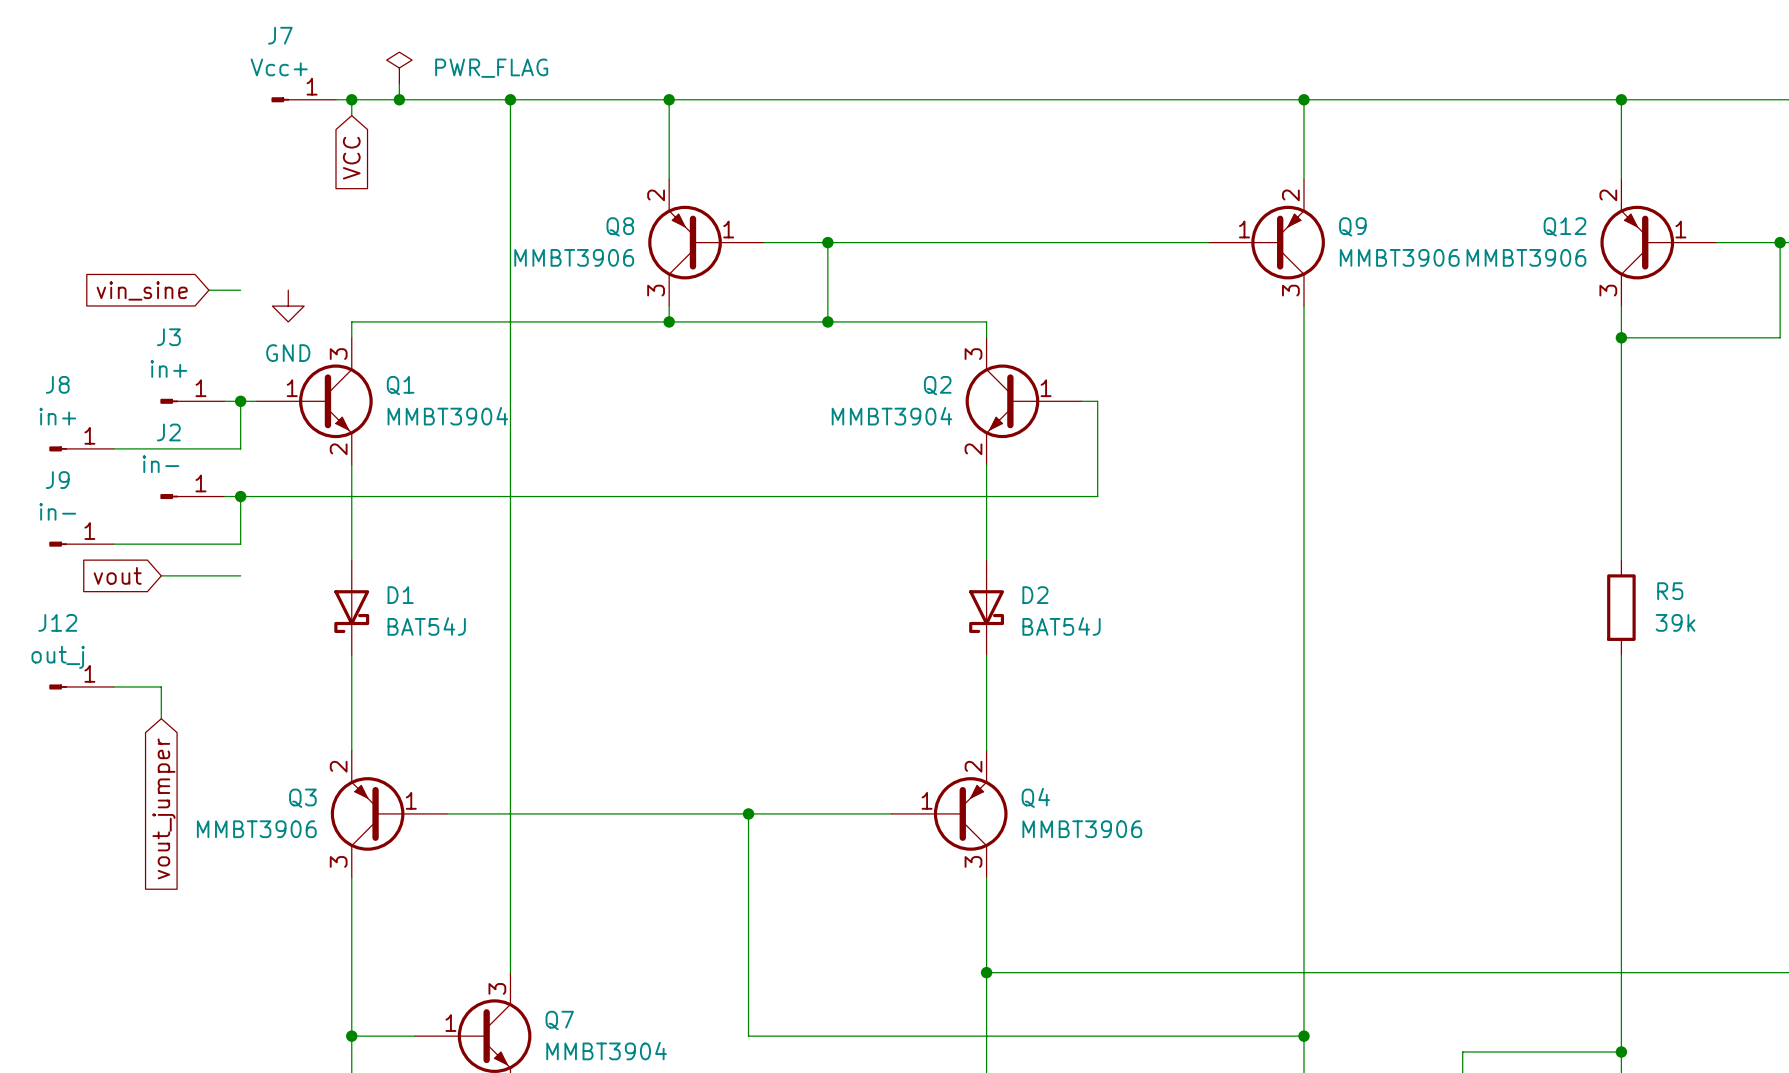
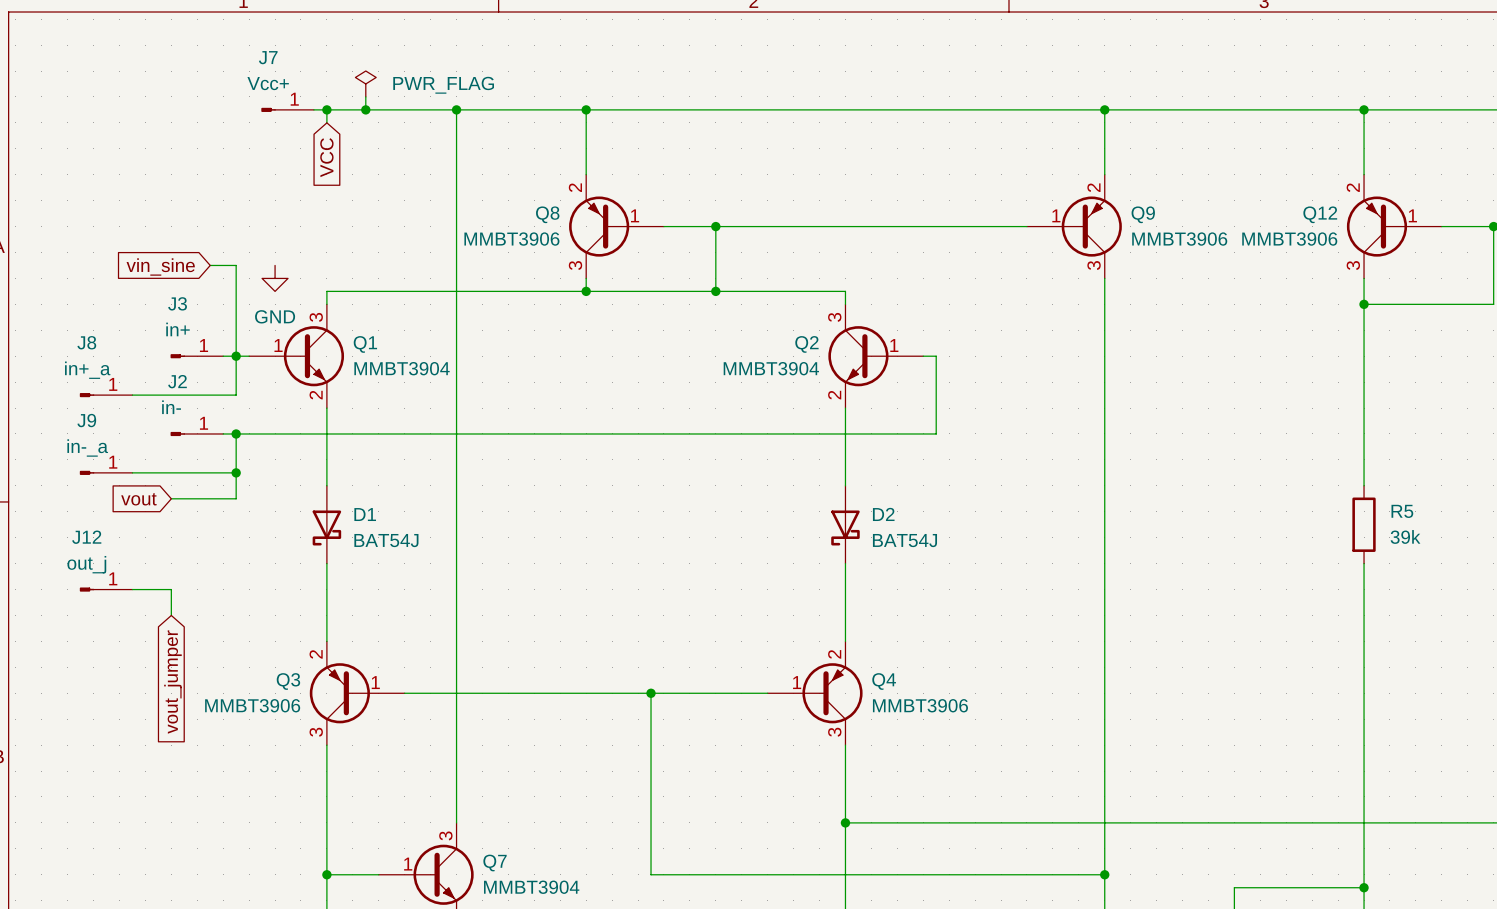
wire: none -> (236, 265) (236, 356)
J8 value: in+ (57, 416) -> in+_a (87, 370)
J9 value: in- (57, 511) -> in-_a (87, 448)
wire: none -> (236, 472) (236, 498)
junction: none -> (236, 472)

